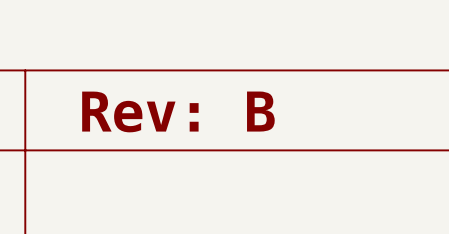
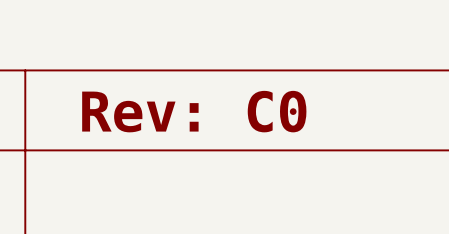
title block: Rev: B (178, 111) -> Rev: C0 (194, 111)

